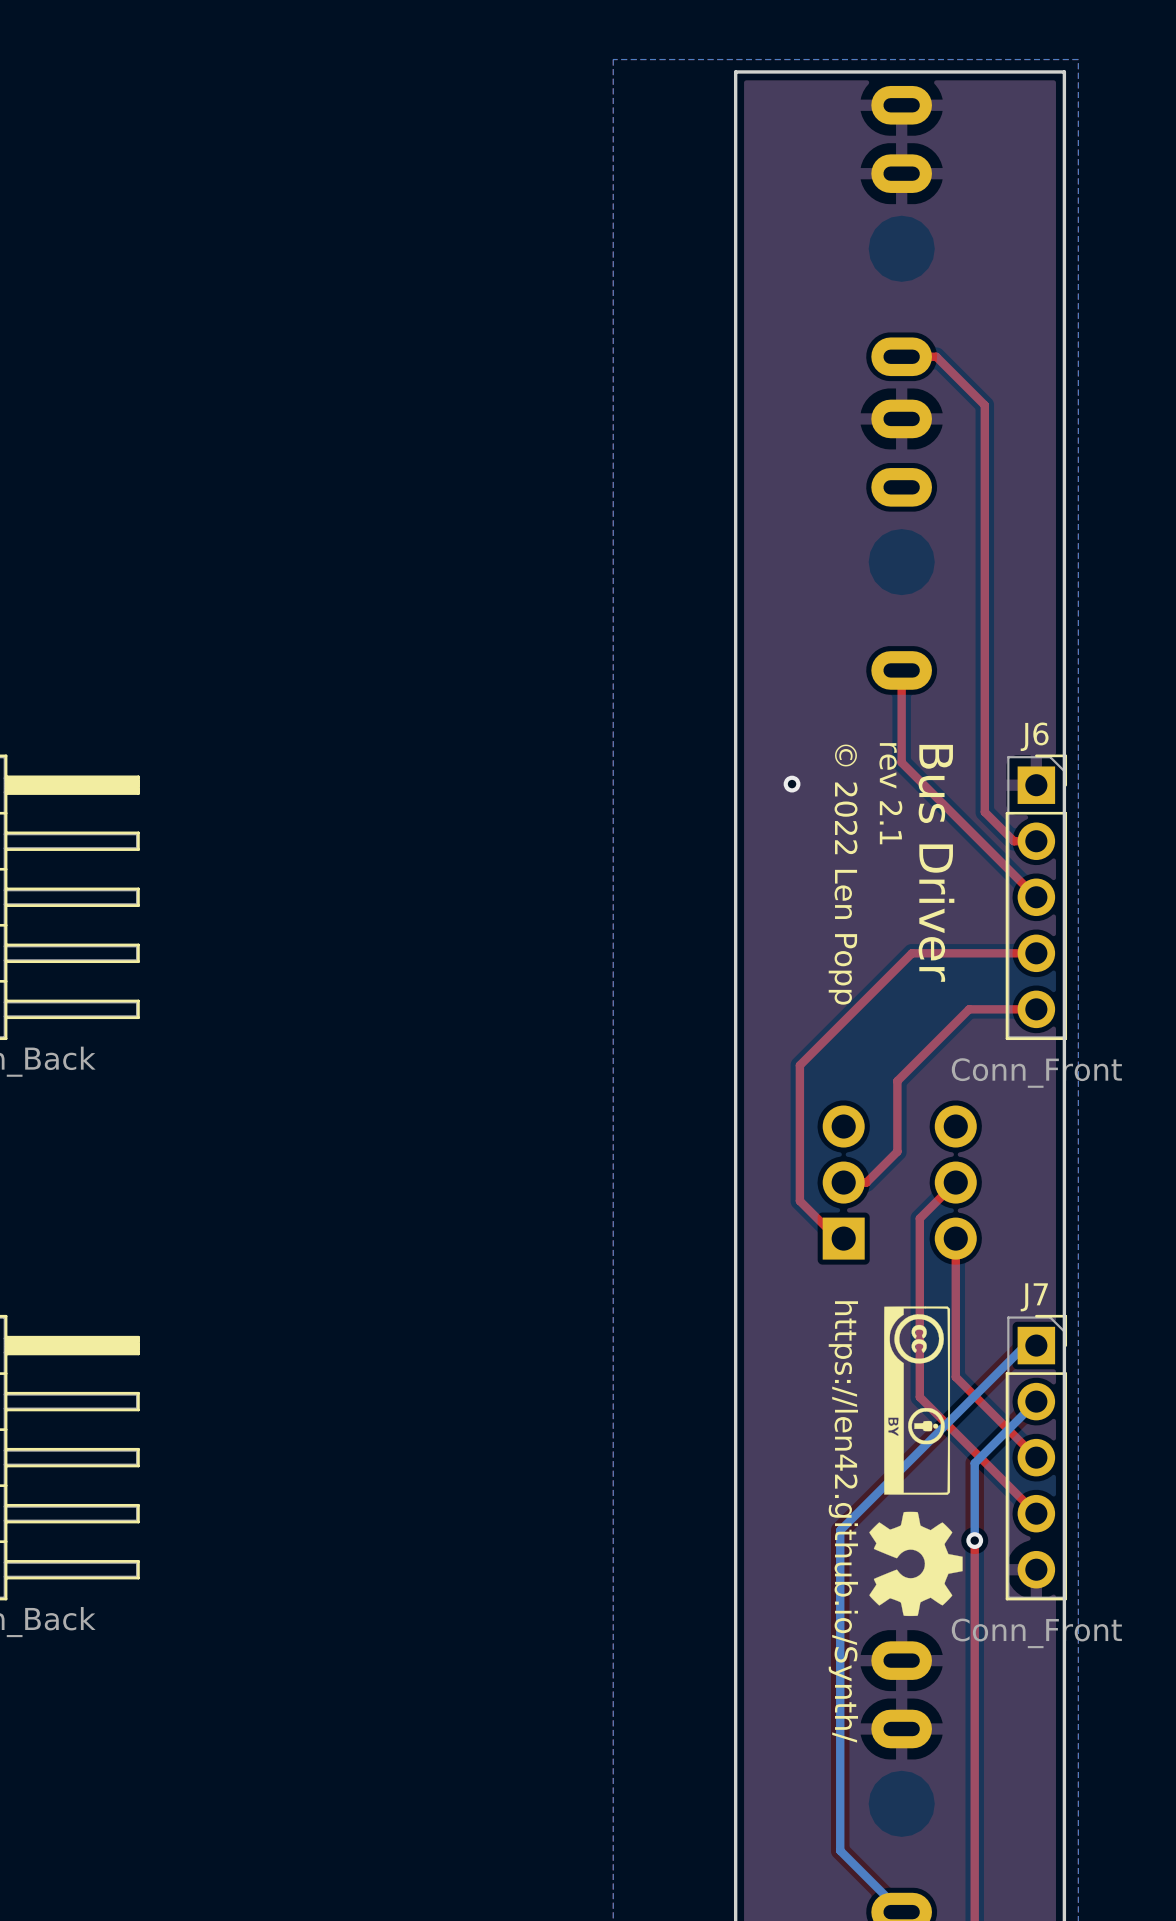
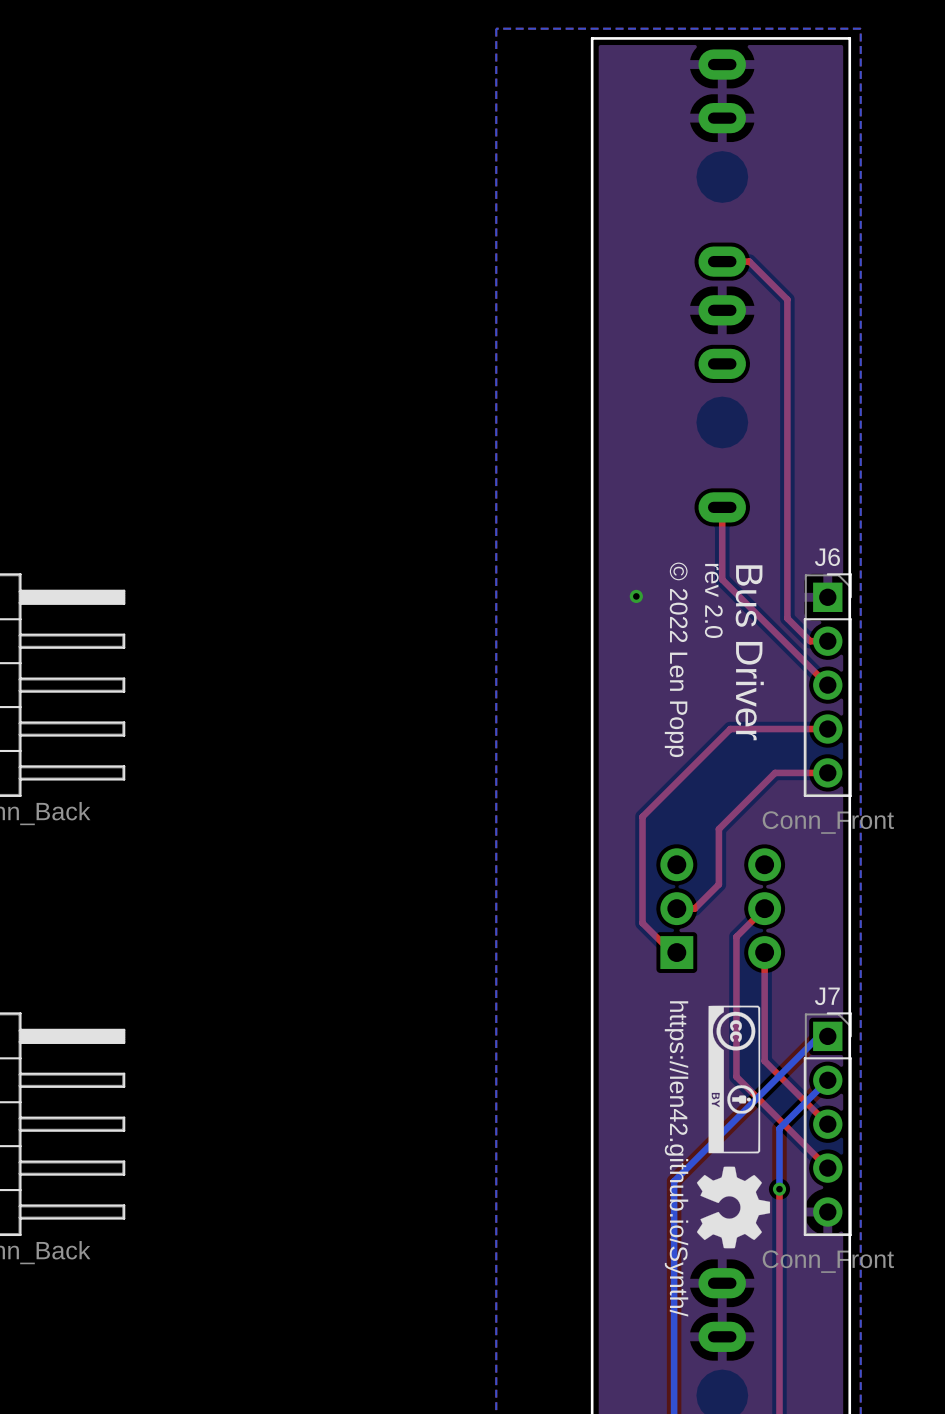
text: rev 2.1 (890, 793) -> rev 2.0 (713, 600)

